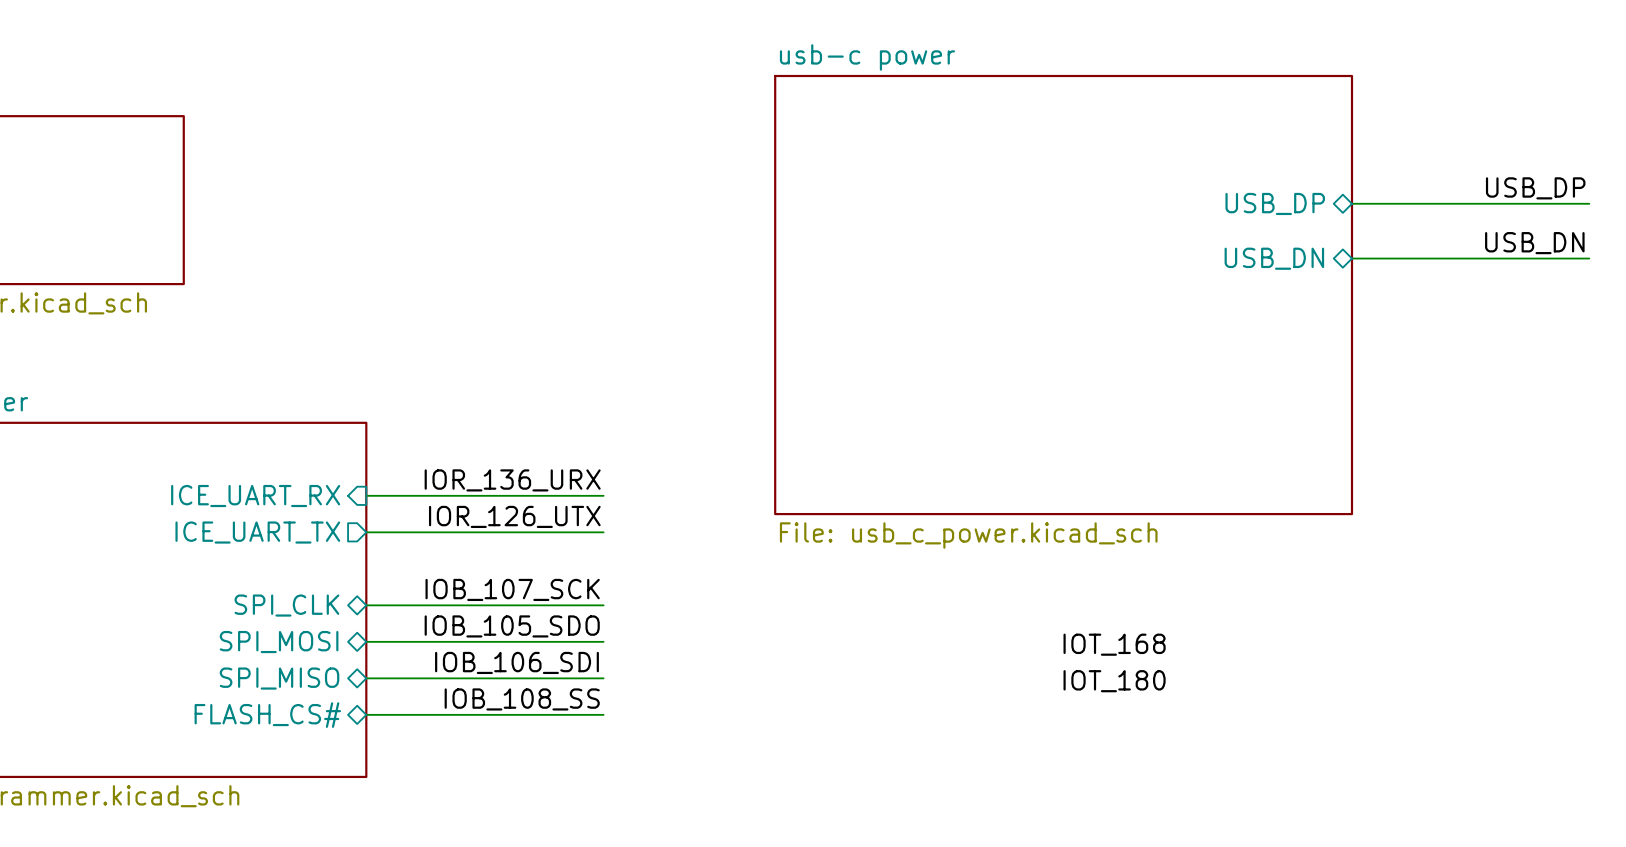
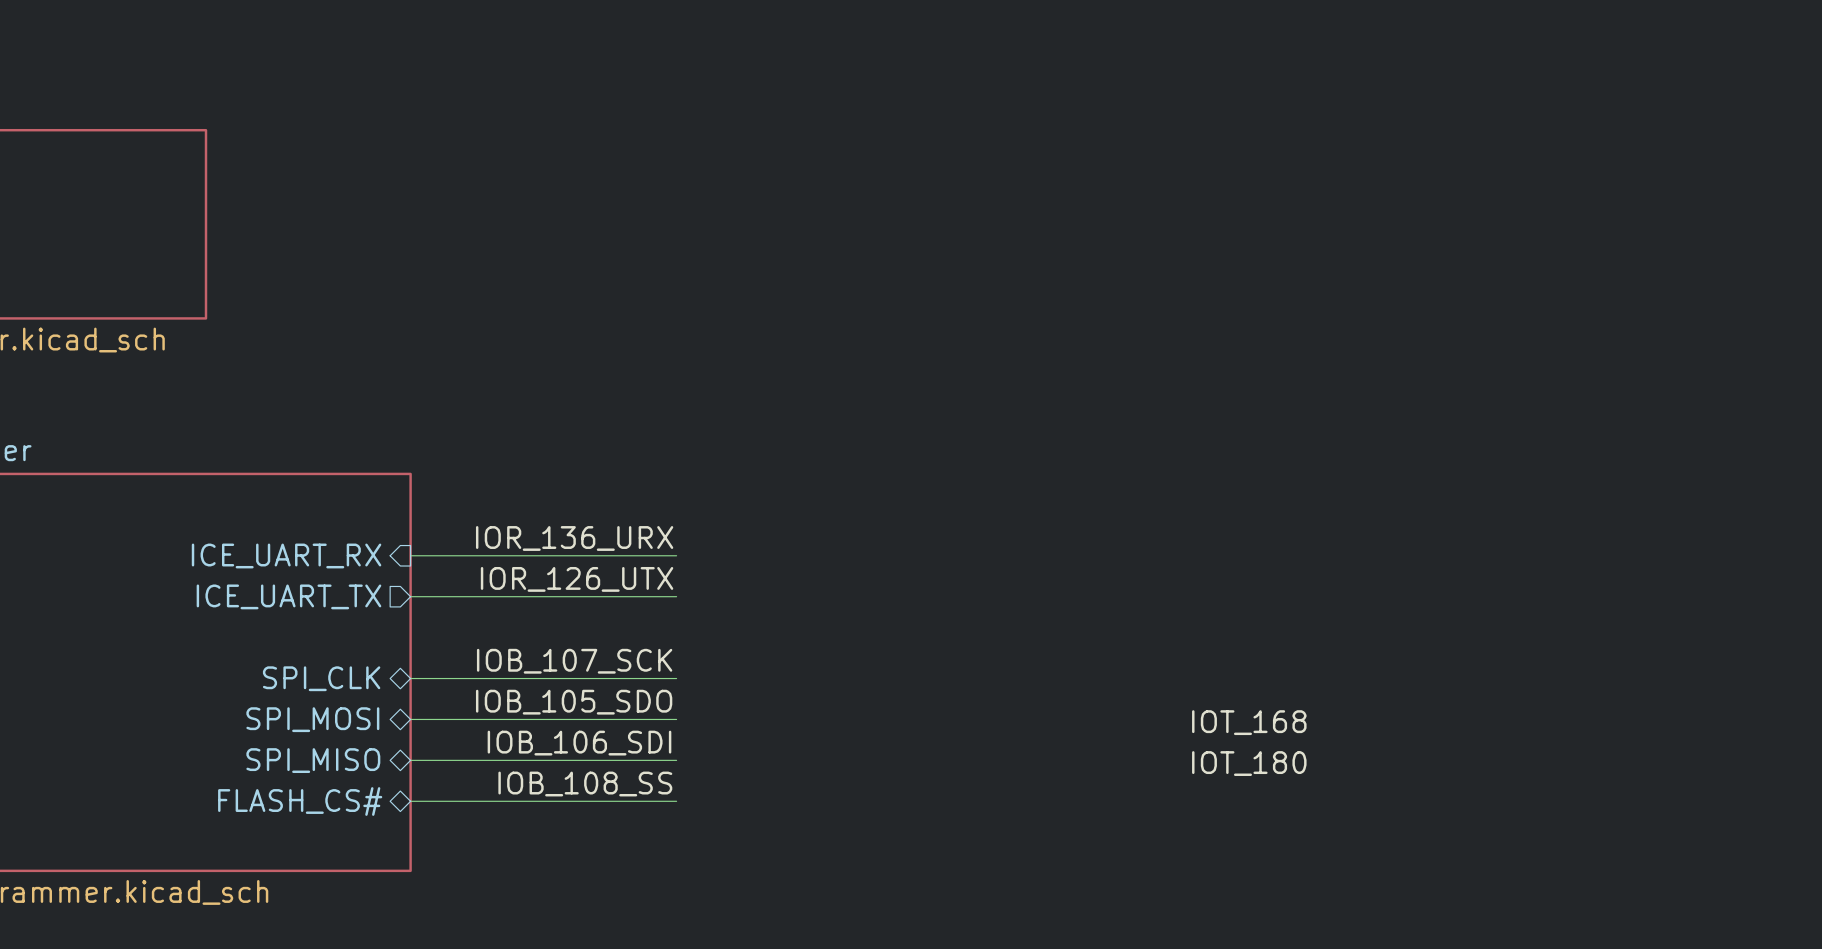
label: USB_DP (1535, 188) -> none
sheet pin: USB_DP (1275, 203) -> none
wire: (1352, 203) (1589, 203) -> none
label: USB_DN (1534, 243) -> none
sheet pin: USB_DN (1274, 258) -> none
wire: (1352, 258) (1589, 258) -> none
sheet usb-c power: File: usb_c_power.kicad_sch (1063, 295) -> none

